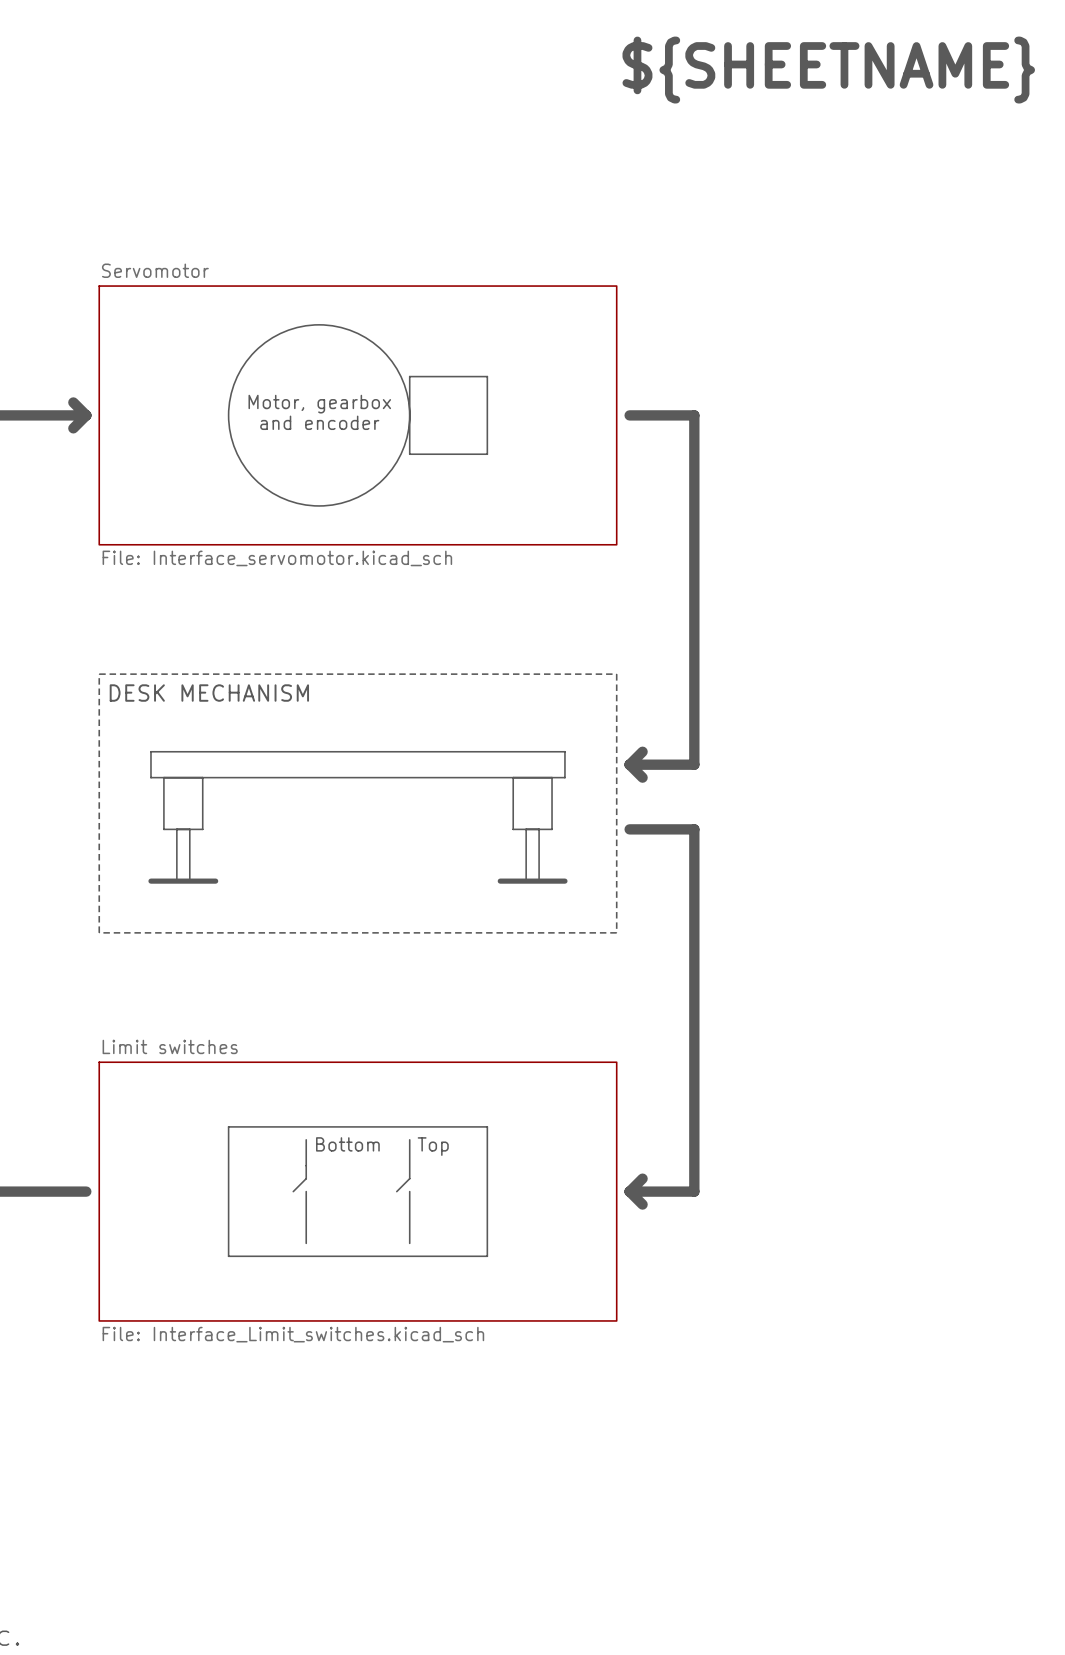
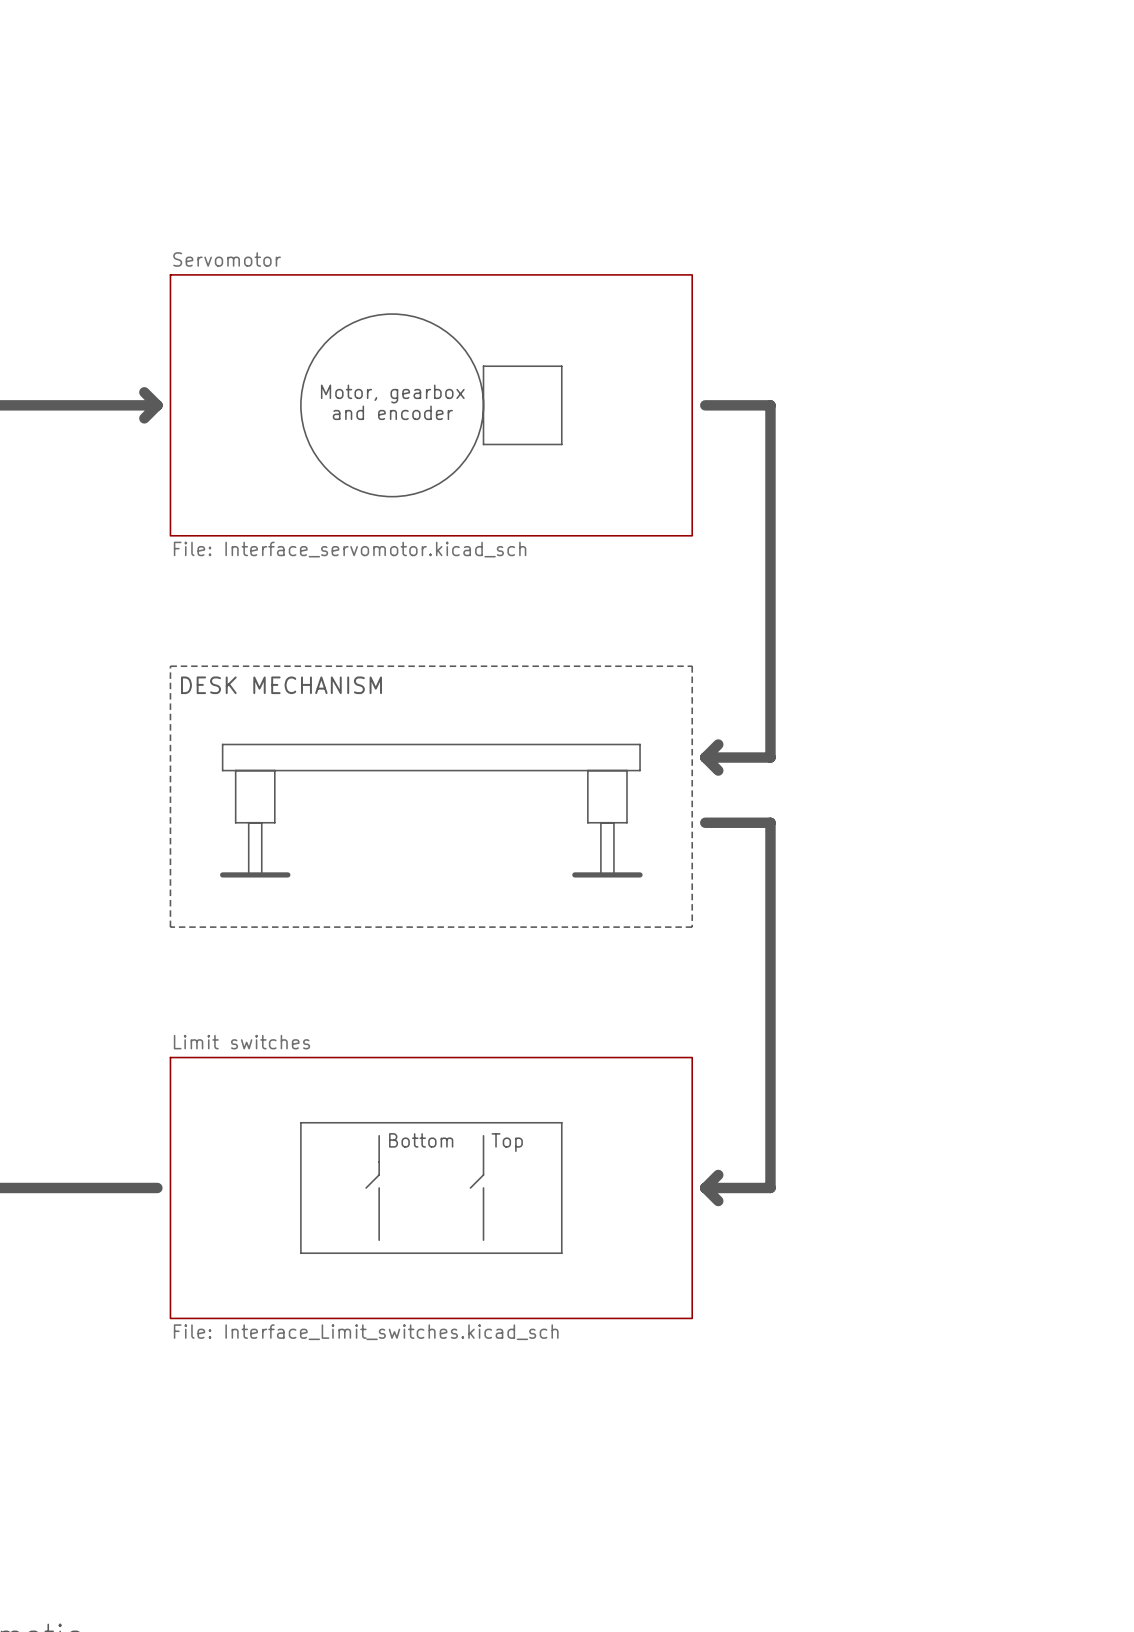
text: ${SHEETNAME} (828, 70) -> none

